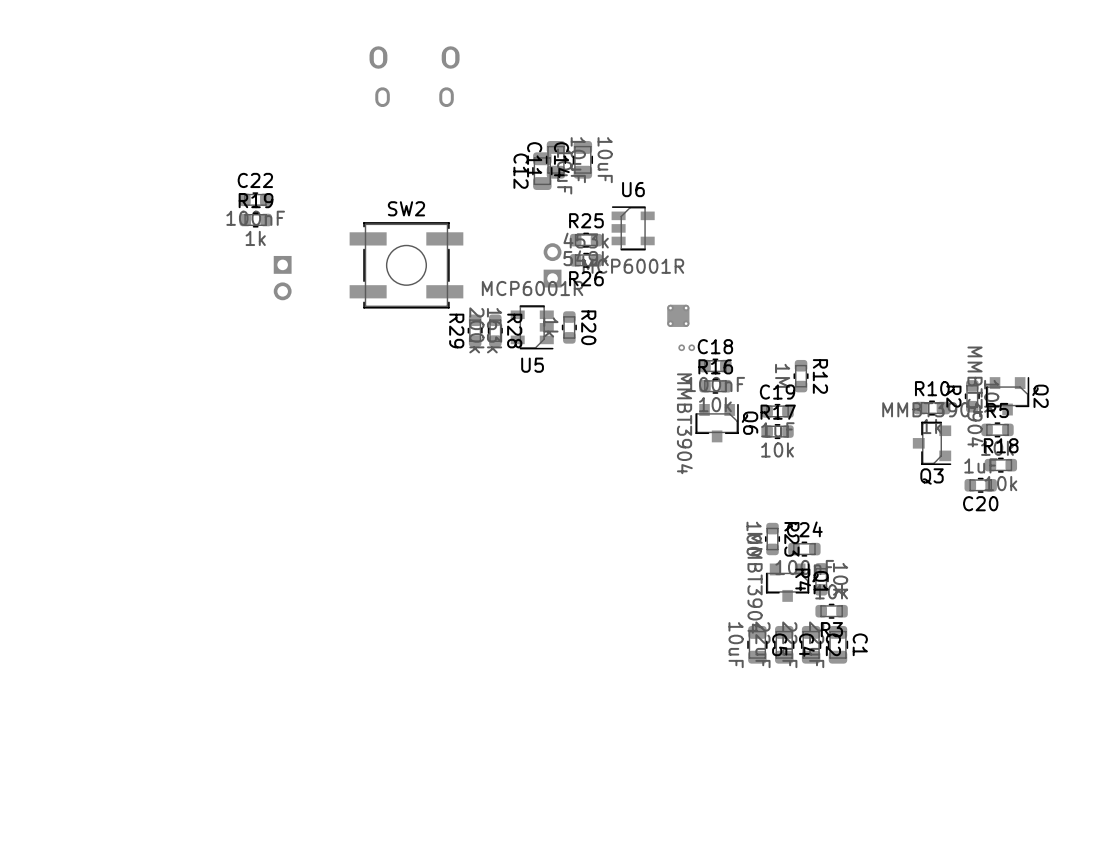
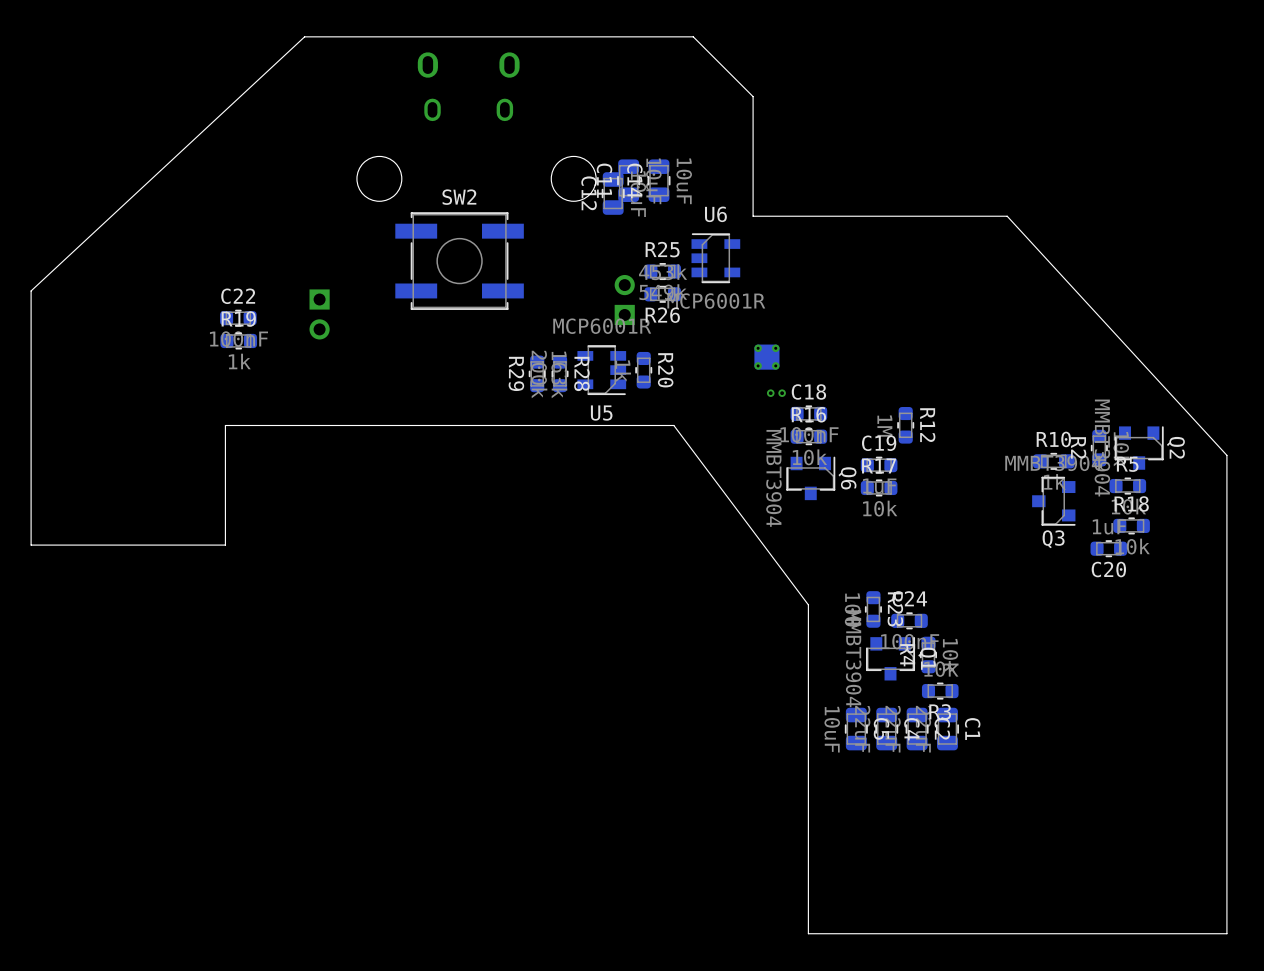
board edge: none -> (693, 36) (753, 96) (753, 216) (1007, 216) (1226, 455) (1226, 933) (808, 933) (808, 604) (673, 425) (225, 425) (225, 545) (31, 545) (31, 290) (304, 36) (693, 36)
round board edge: none -> [356, 156, 403, 202]
round board edge: none -> [550, 156, 597, 202]
C22 position: (255, 199) -> (238, 318)
R19 position: (255, 220) -> (238, 340)
SW2 position: (406, 265) -> (459, 261)

